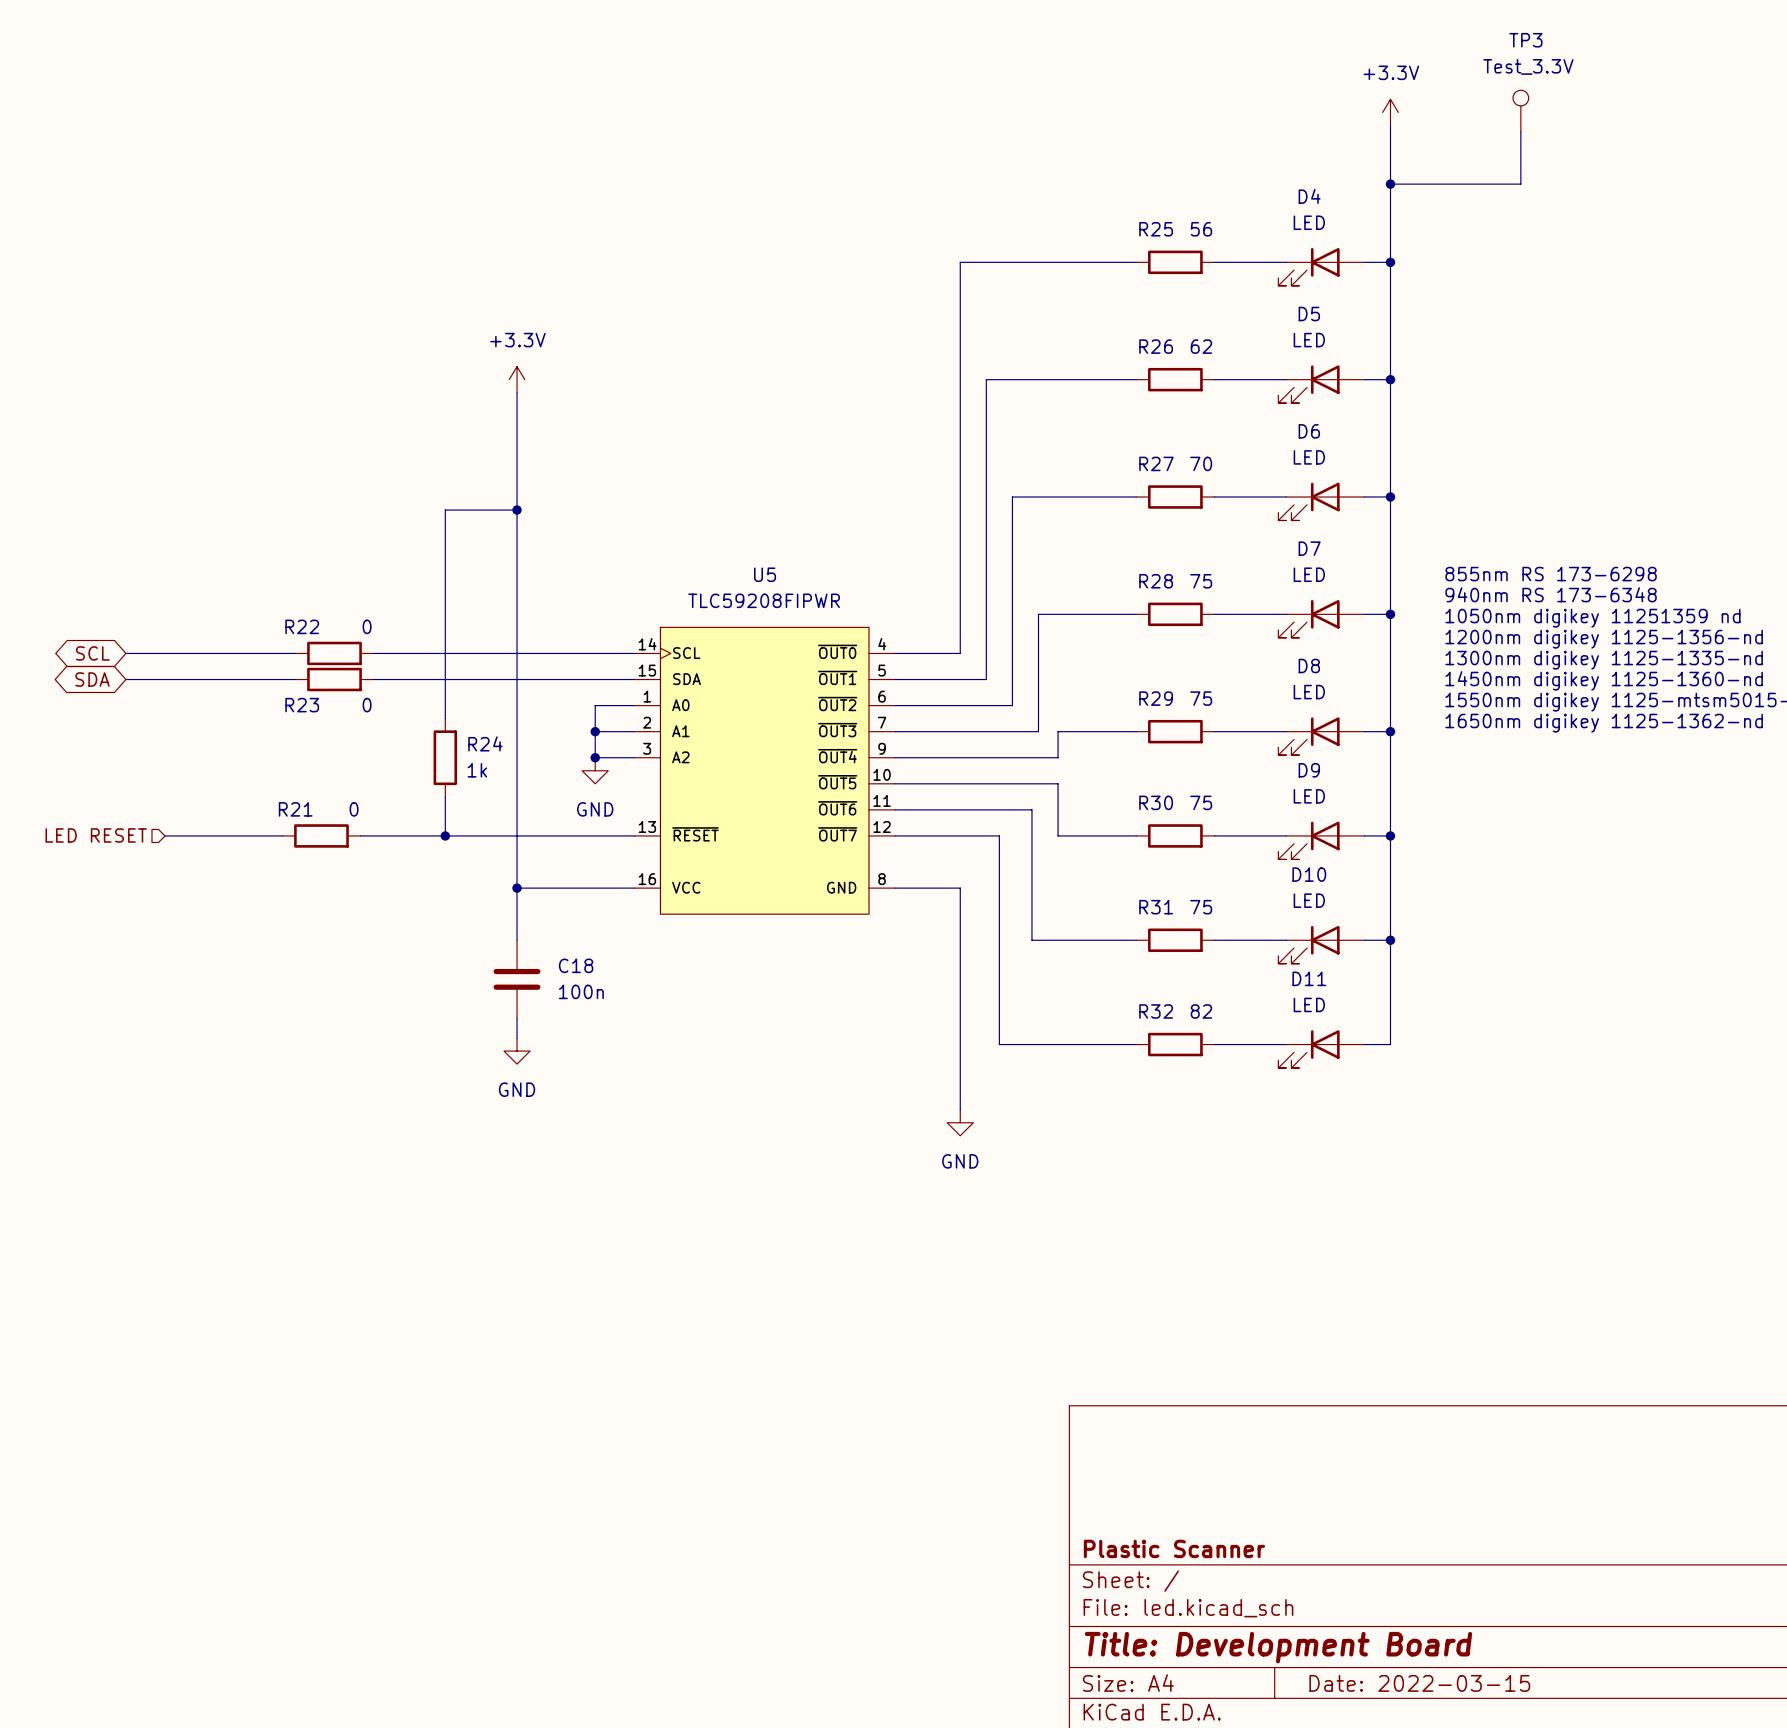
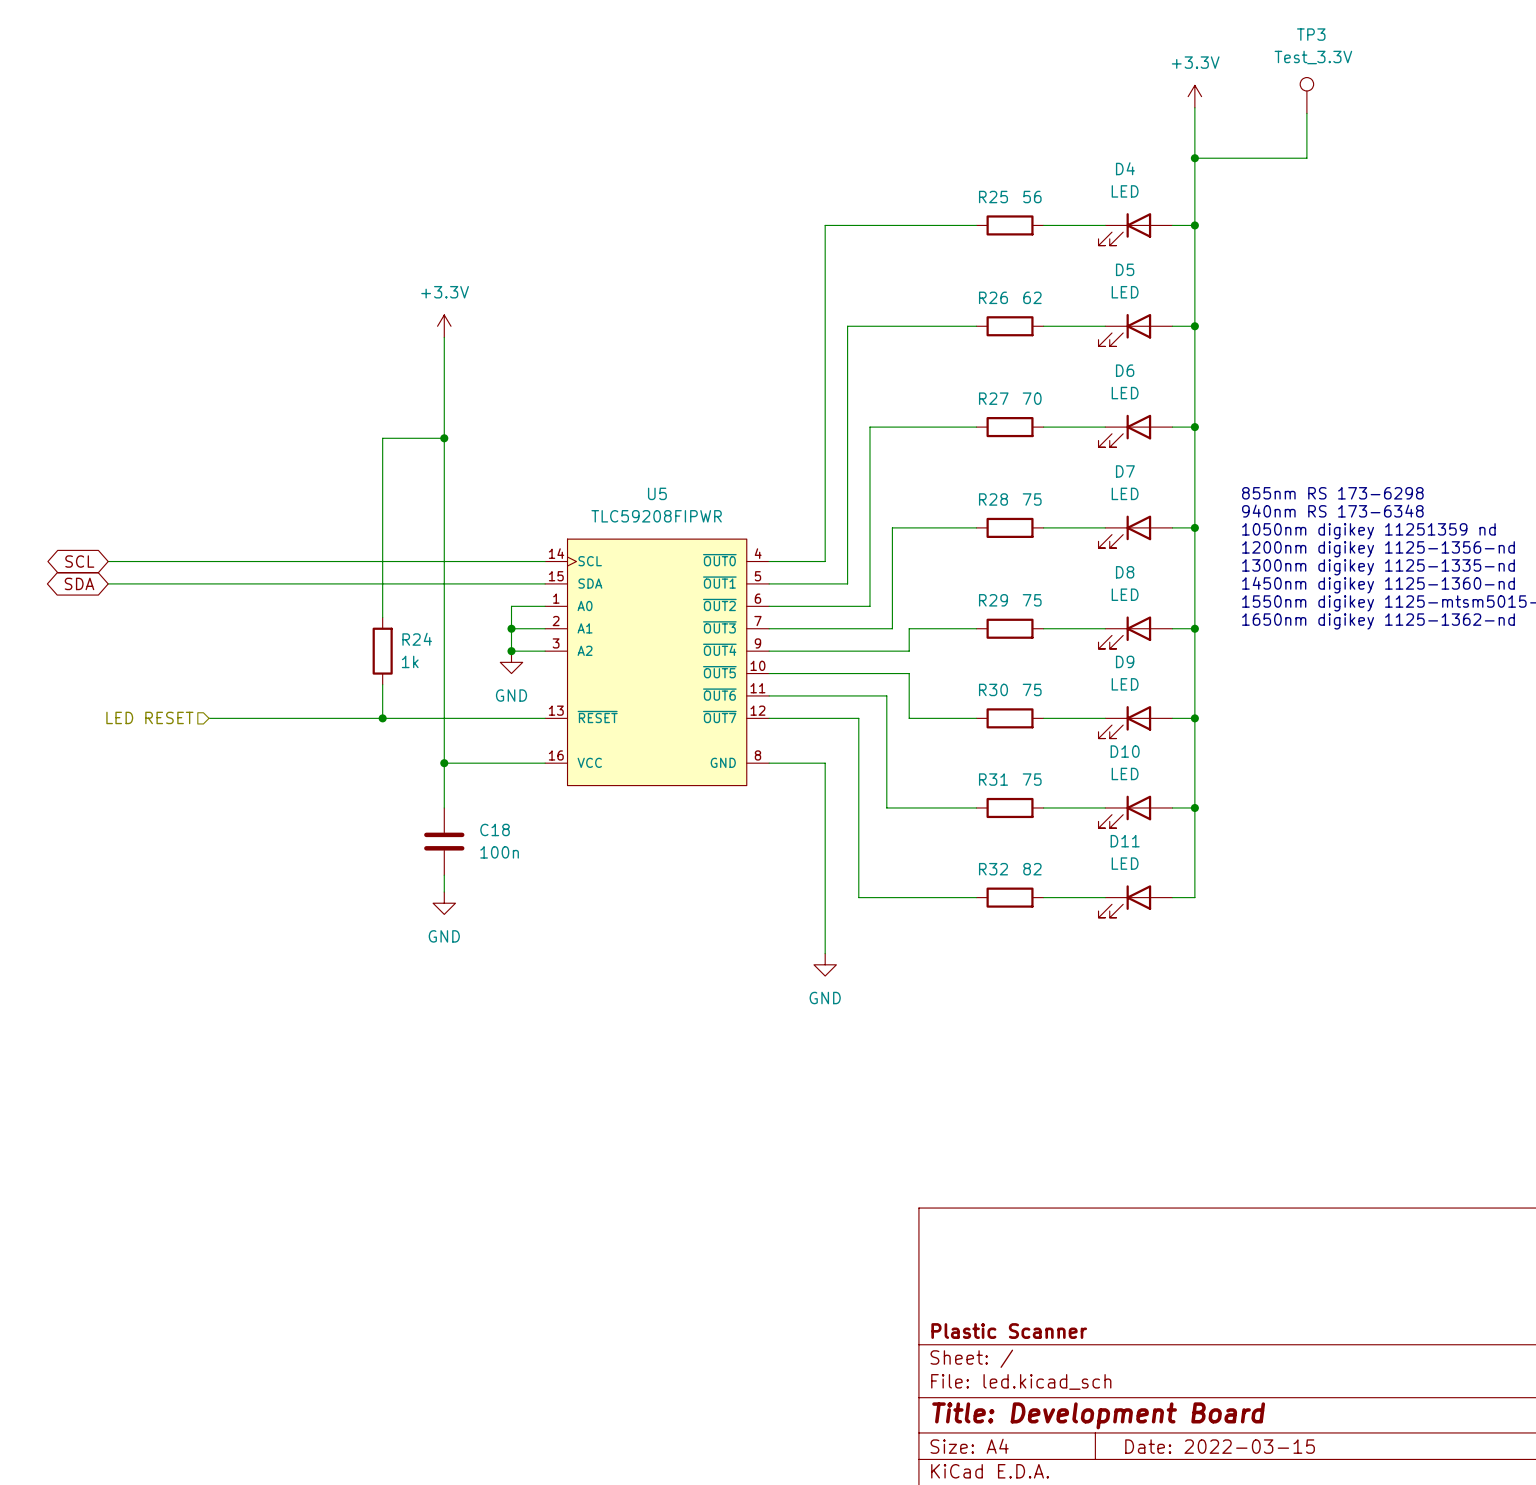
wire: none -> (253, 561) (321, 561)
R22: 0 (334, 653) -> none
wire: none -> (253, 583) (321, 583)
R23: 0 (334, 679) -> none
hierarchical label position: LED RESET (96, 835) -> LED RESET (149, 717)
wire: (165, 835) (243, 835) -> (242, 718) (309, 718)
R21: 0 (321, 835) -> none

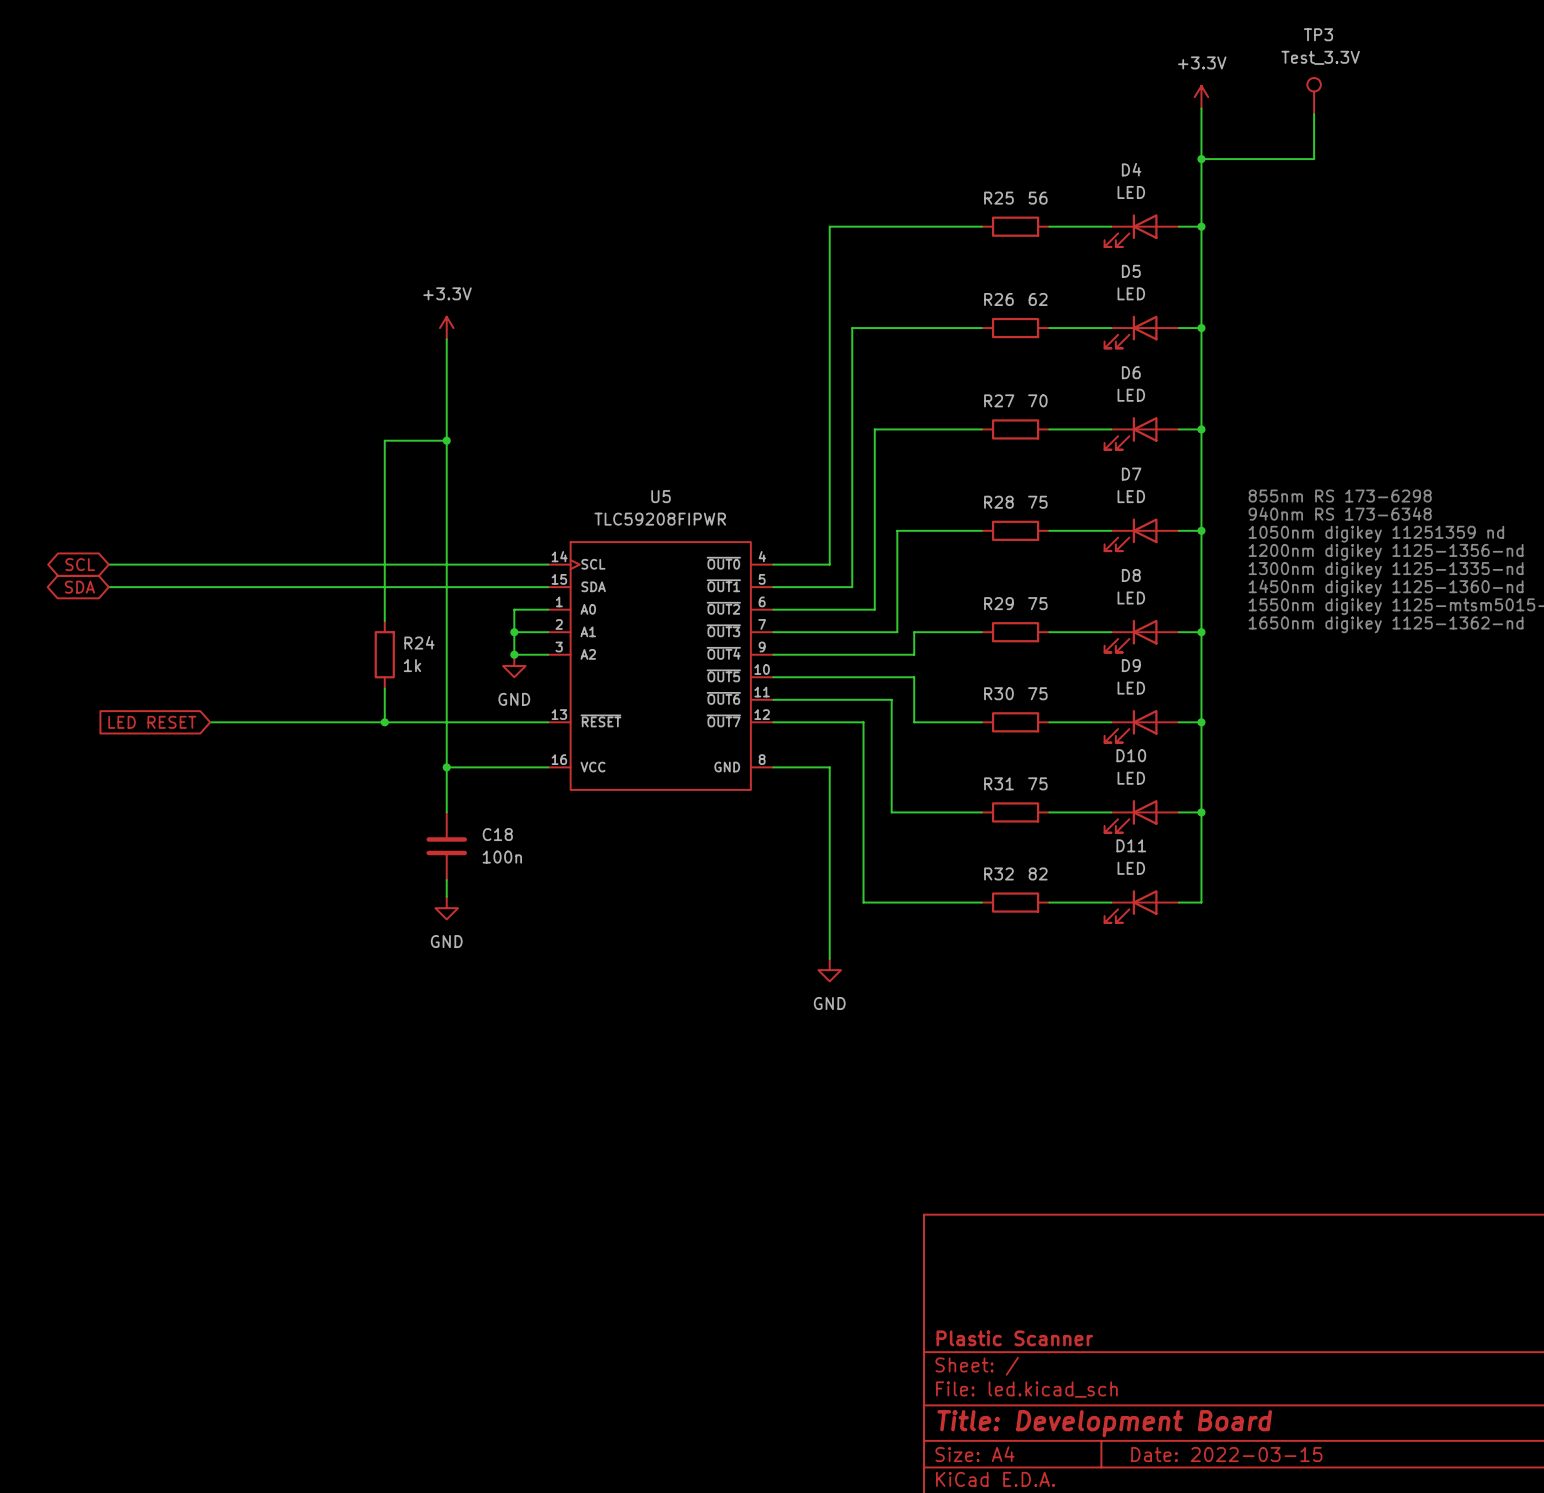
hierarchical label: LED RESET (149, 717) -> none
global label: none -> LED RESET (152, 722)

